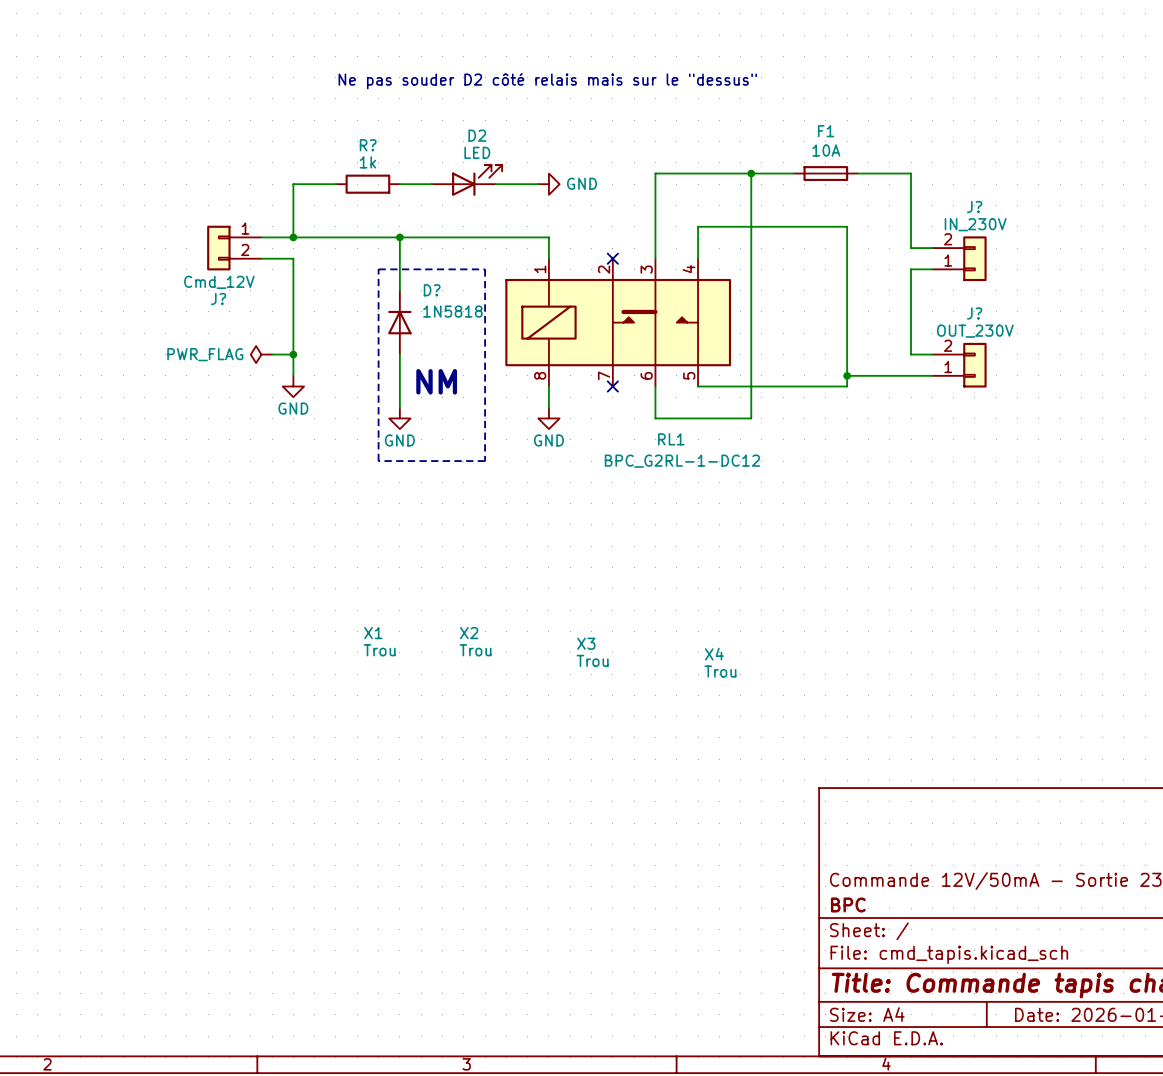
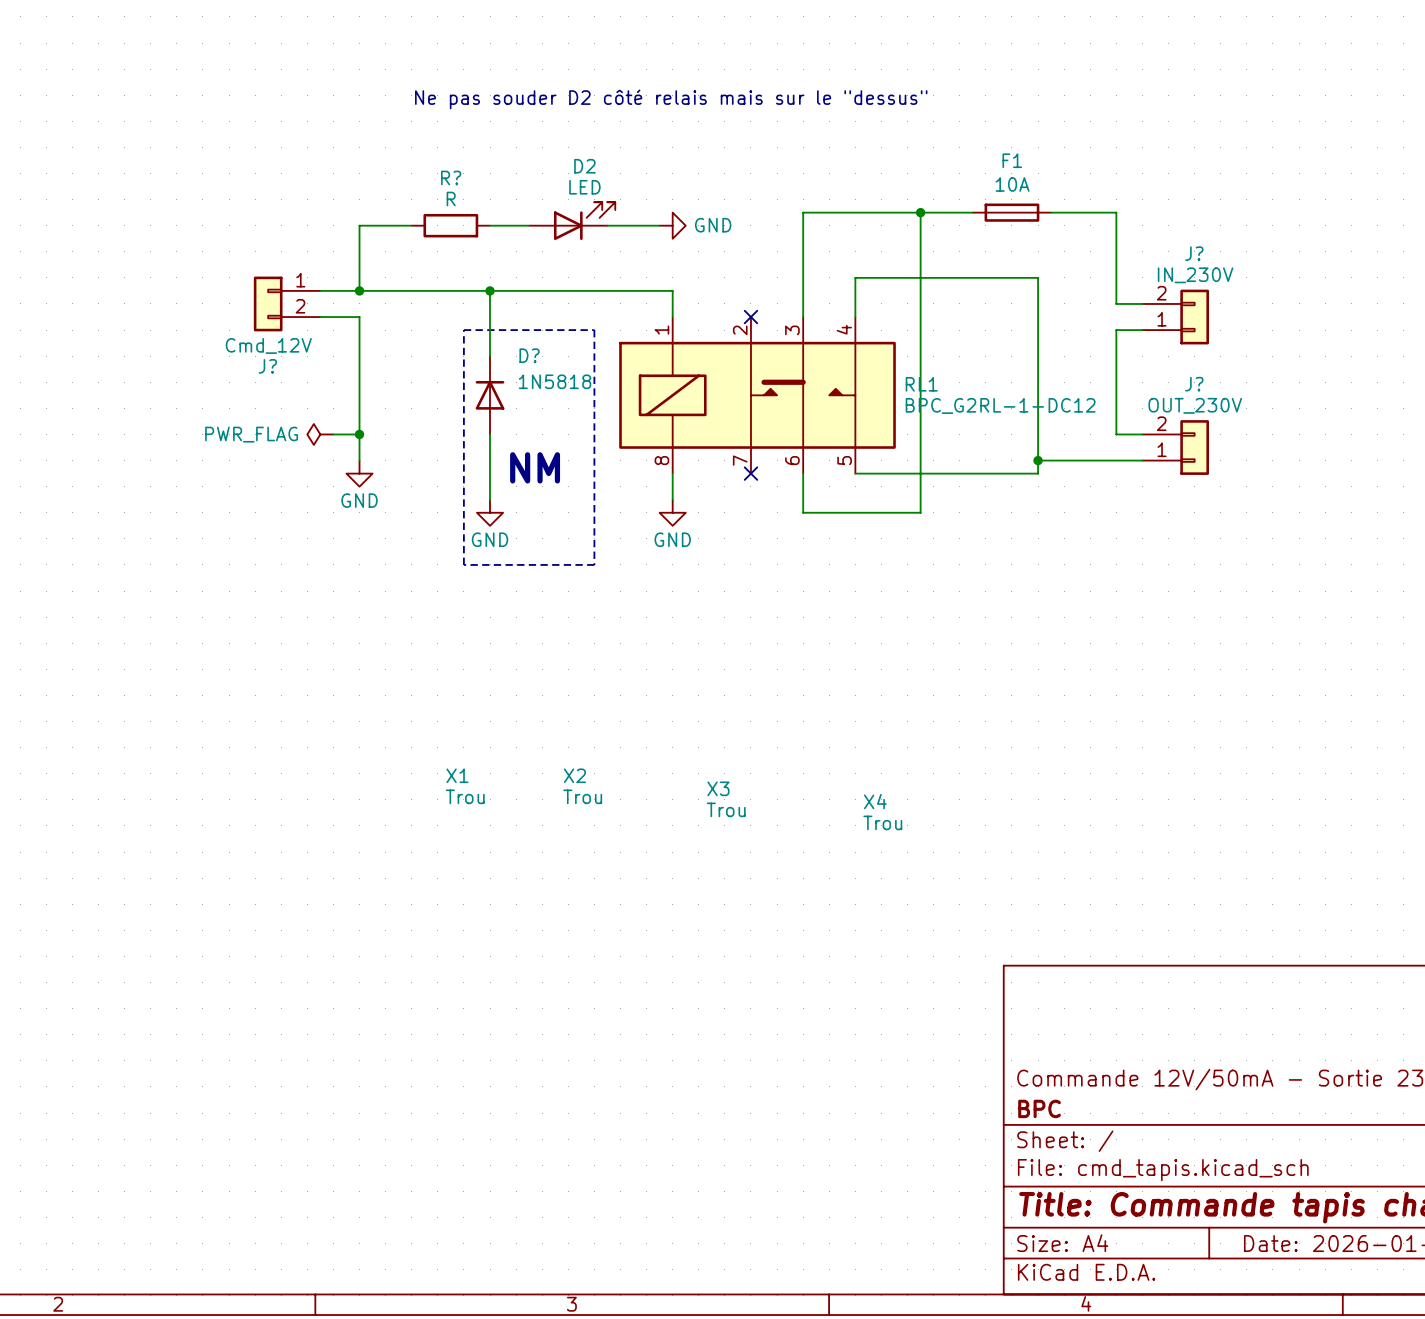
R? value: 1k (367, 162) -> R (451, 199)
RL1 name position: RL1 (671, 439) -> RL1 (921, 384)
RL1 value position: BPC_G2RL-1-DC12 (682, 461) -> BPC_G2RL-1-DC12 (1000, 405)

